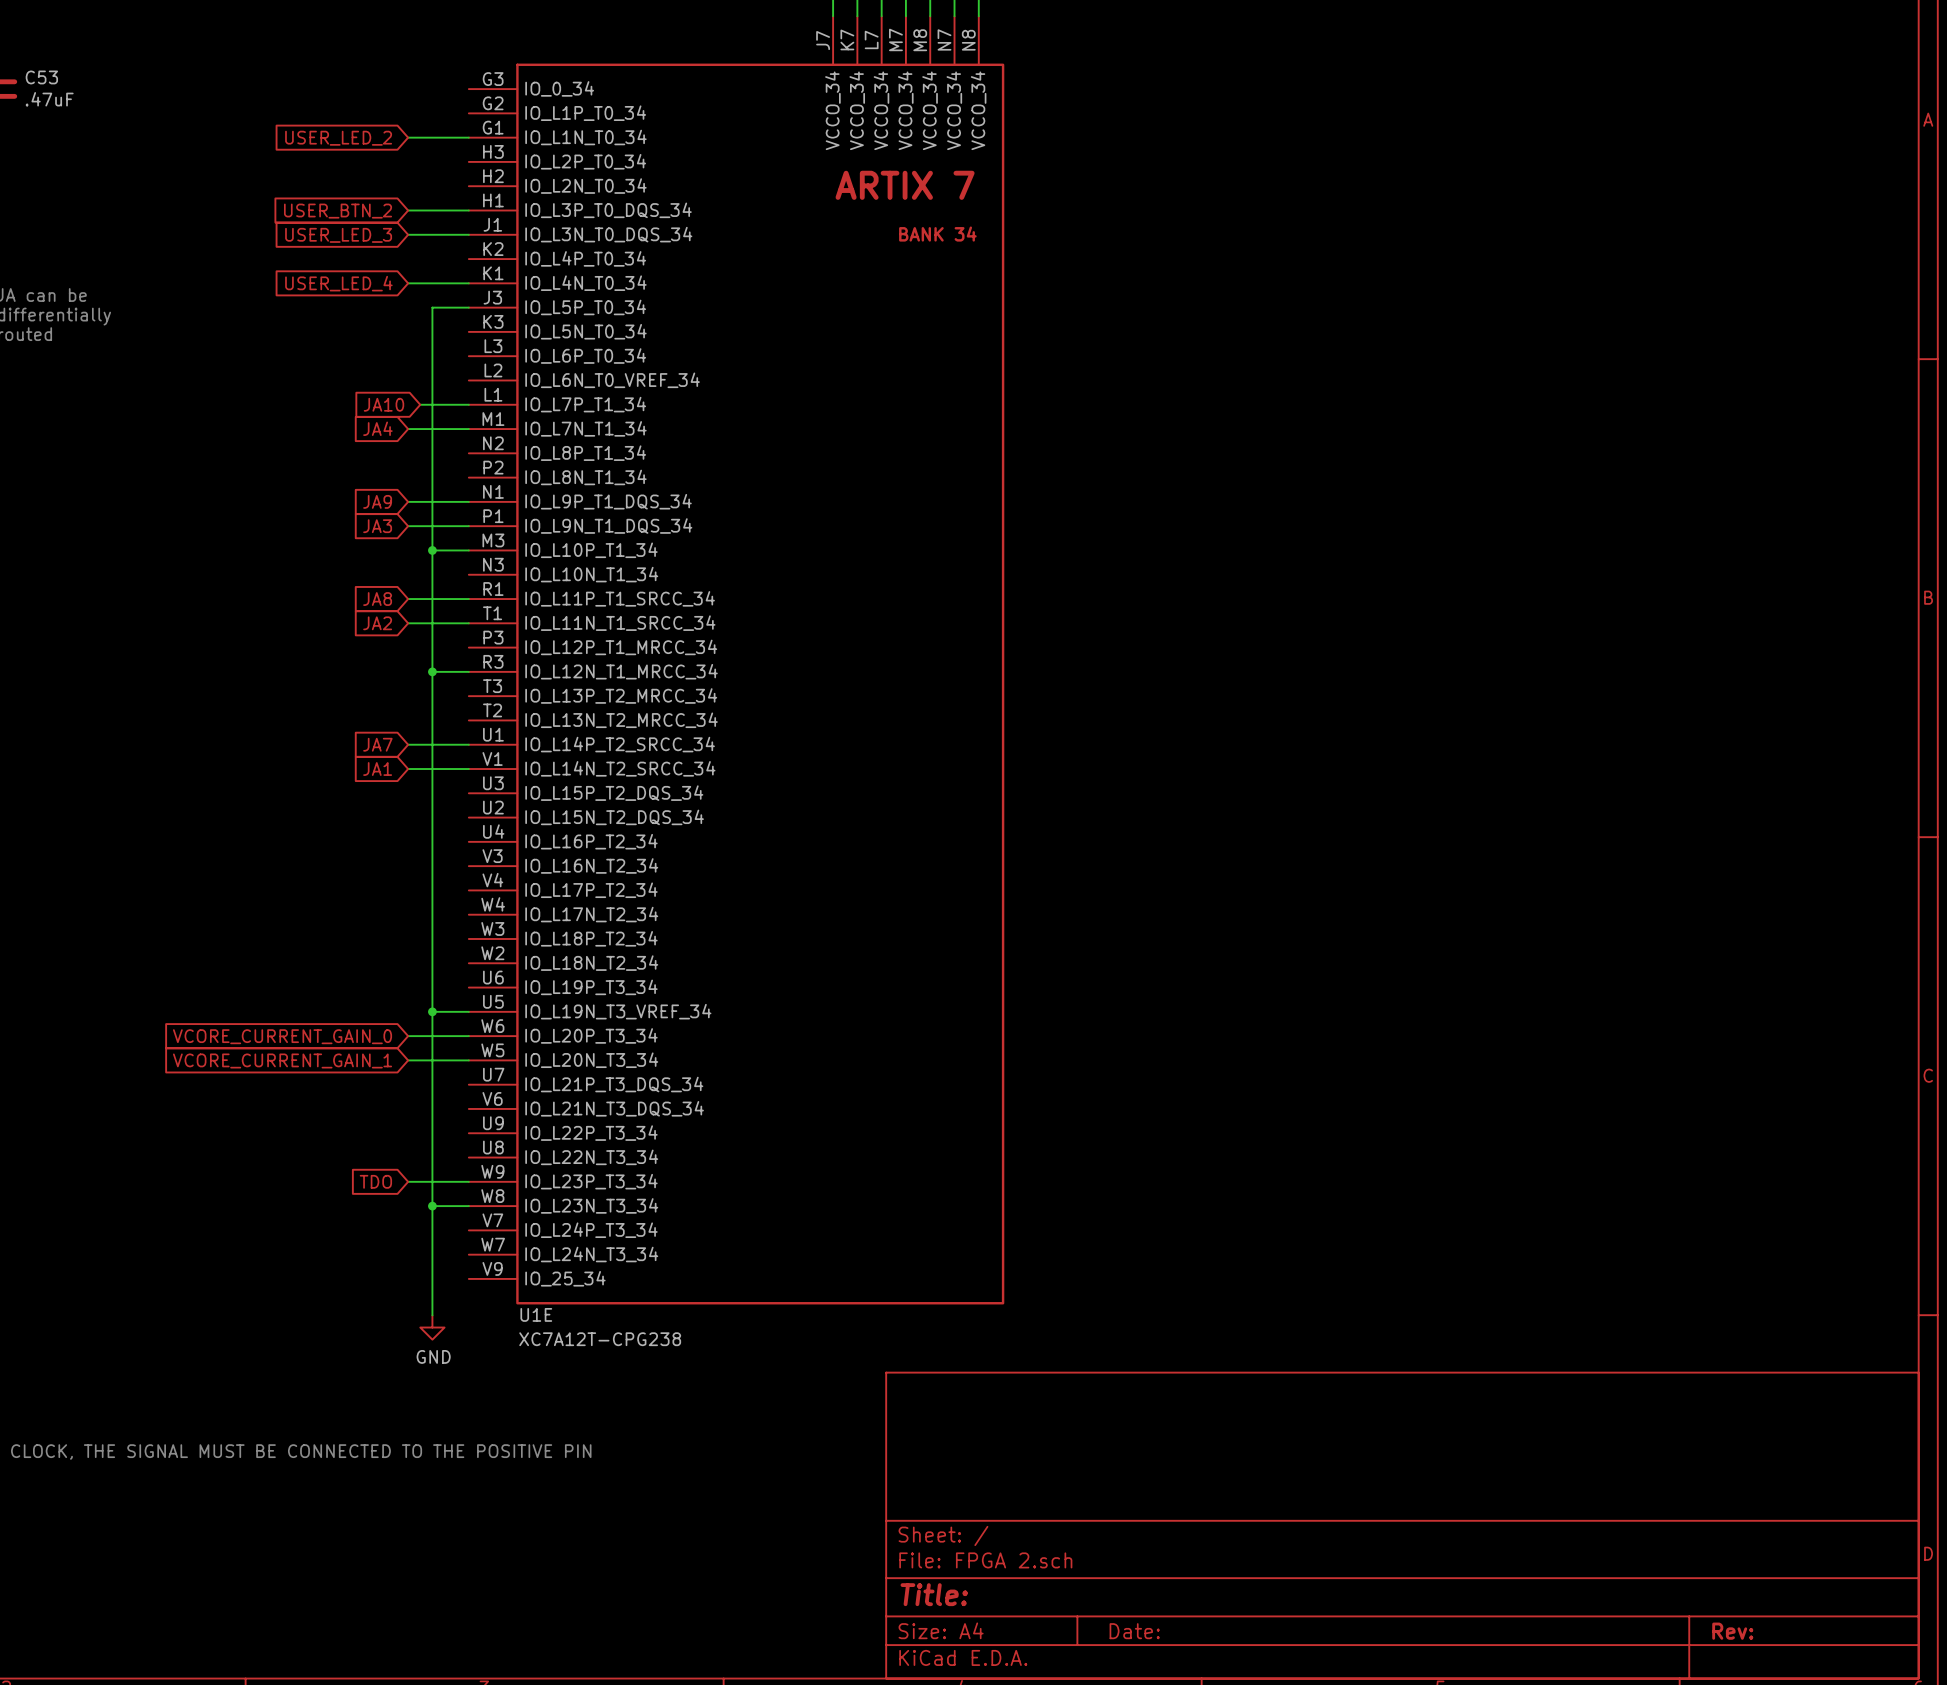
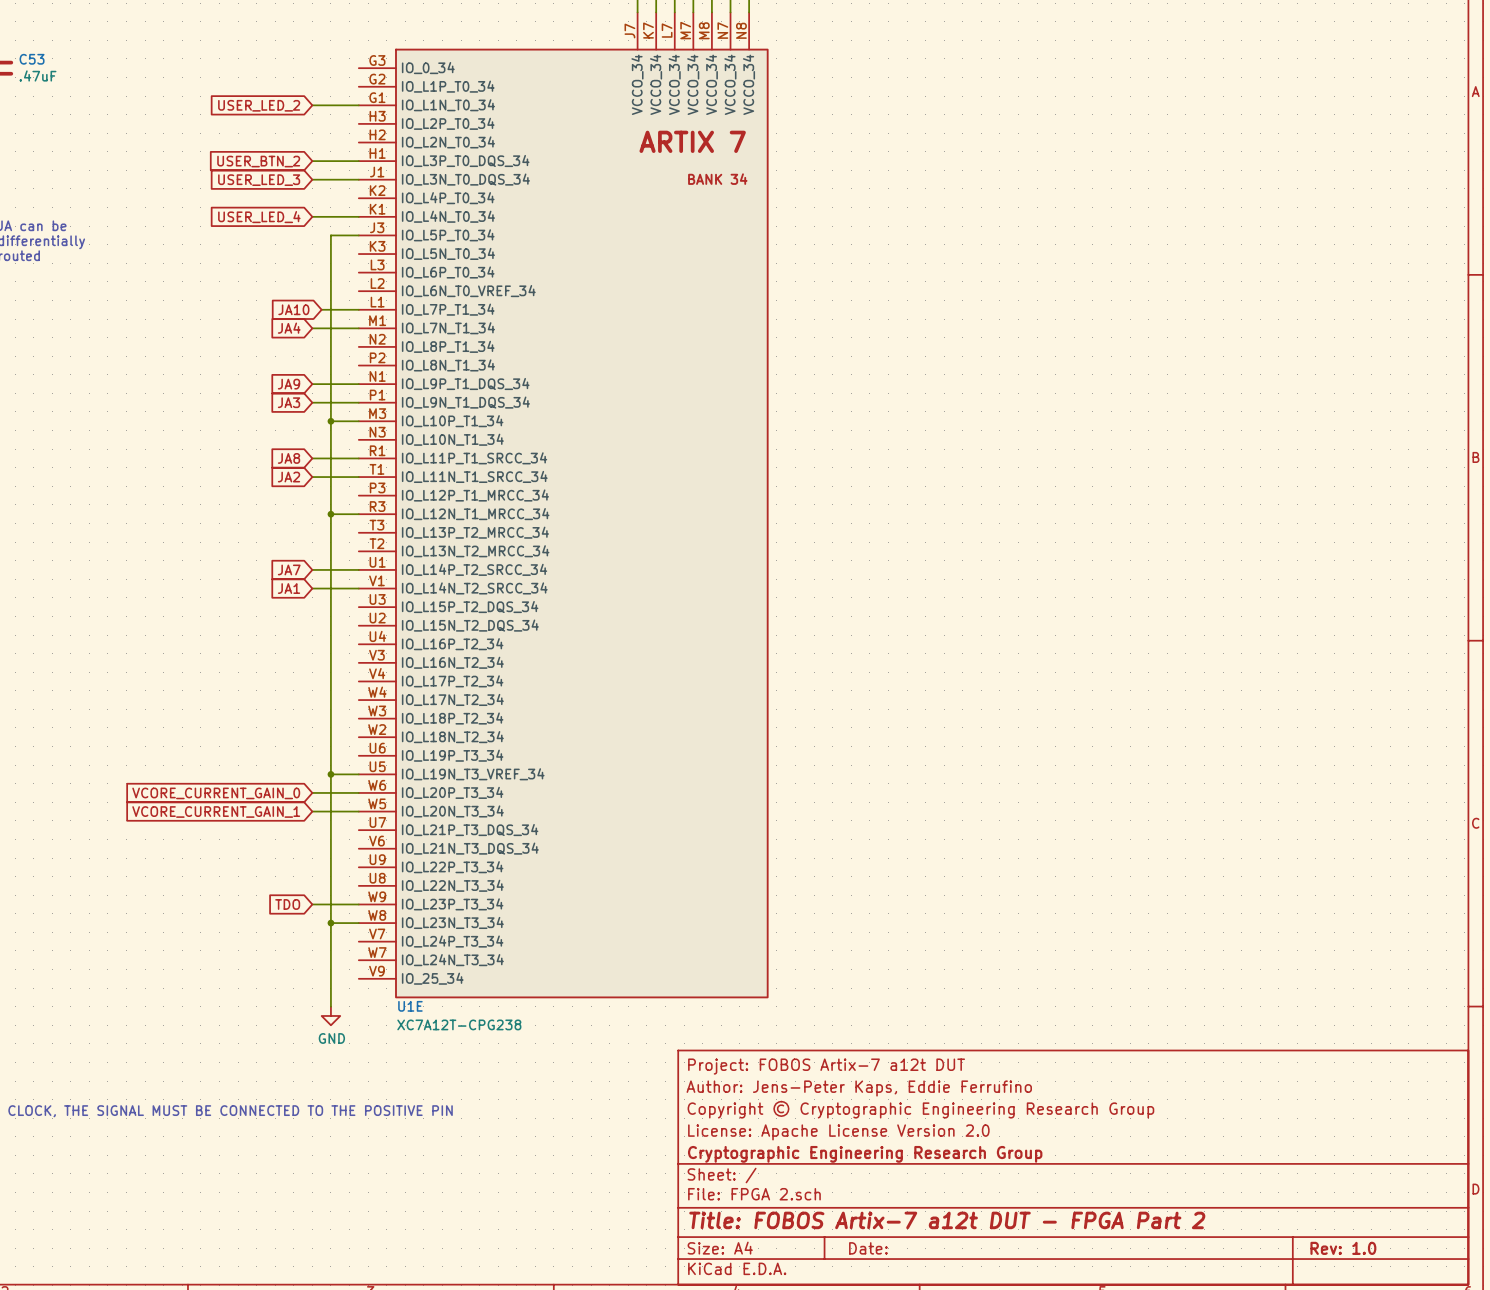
title block: none -> Project: FOBOS Artix-7 a12t DUT (826, 1066)
title block: none -> Author: Jens-Peter Kaps, Eddie Ferrufino (859, 1088)
title block: none -> Copyright © Cryptographic Engineering Research Group (920, 1109)
title block: none -> License: Apache License Version 2.0 (838, 1132)
title block: none -> Cryptographic Engineering Research Group (865, 1154)
title block: Title: (934, 1594) -> Title: FOBOS Artix-7 a12t DUT - FPGA Part 2 (947, 1220)
title block: Rev: (1732, 1631) -> Rev: 1.0 (1343, 1248)

